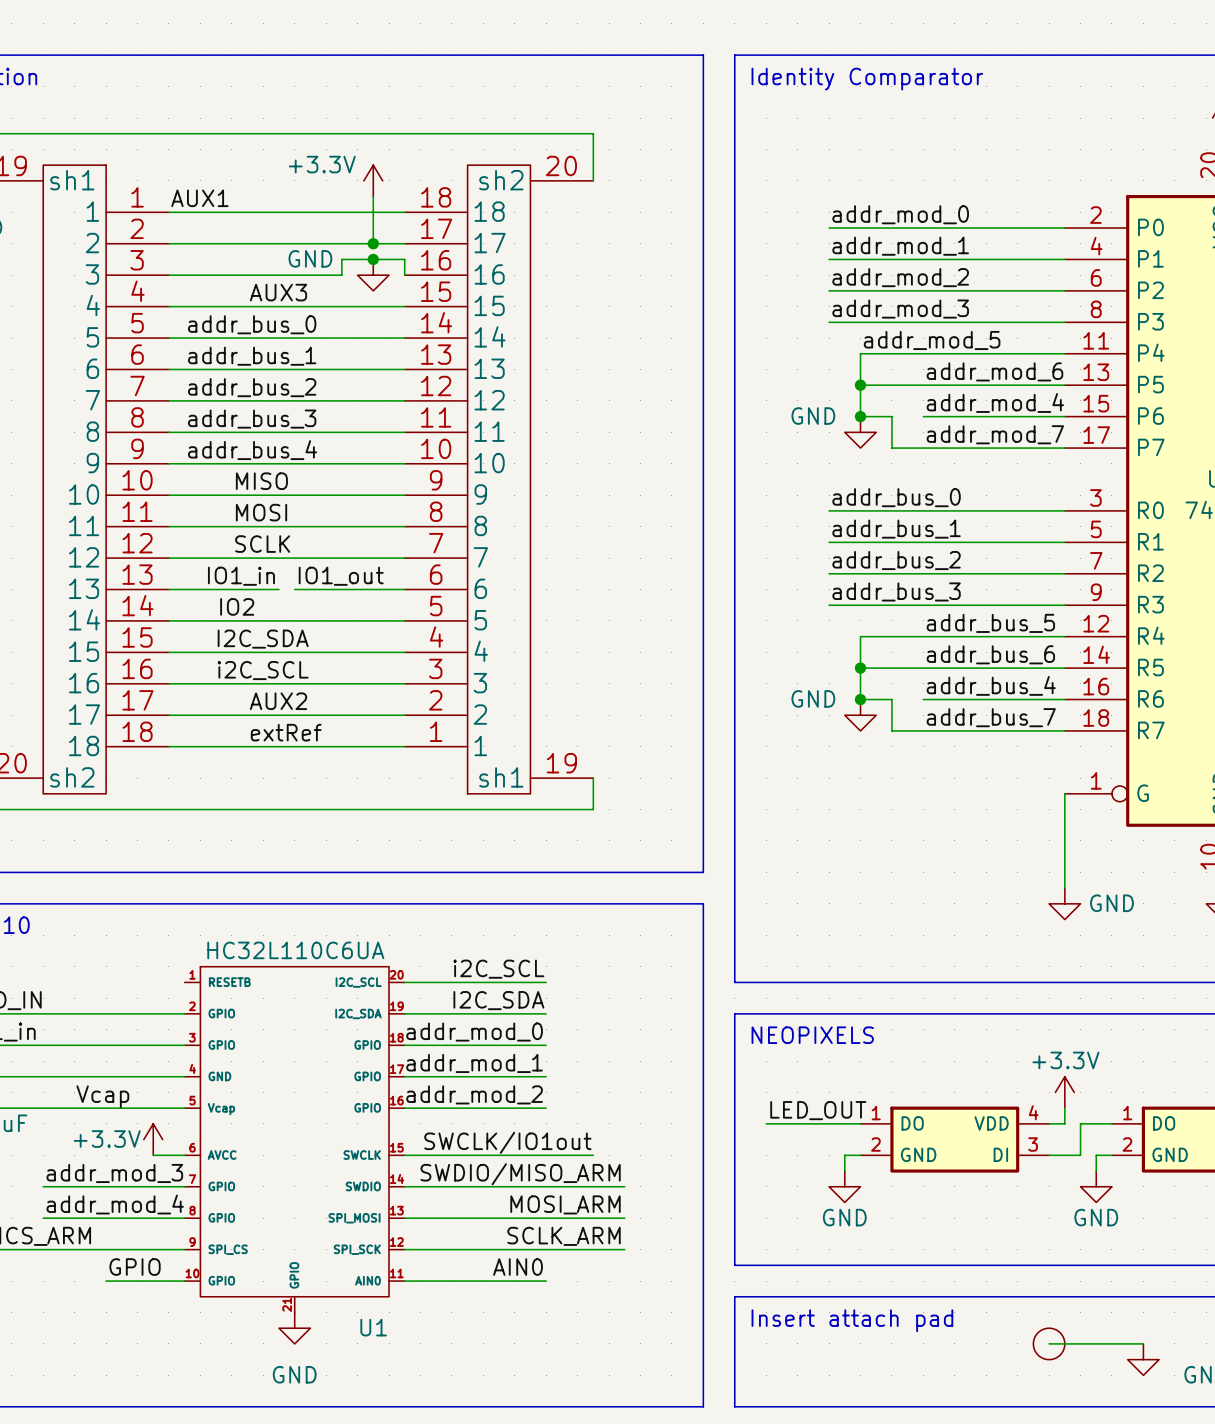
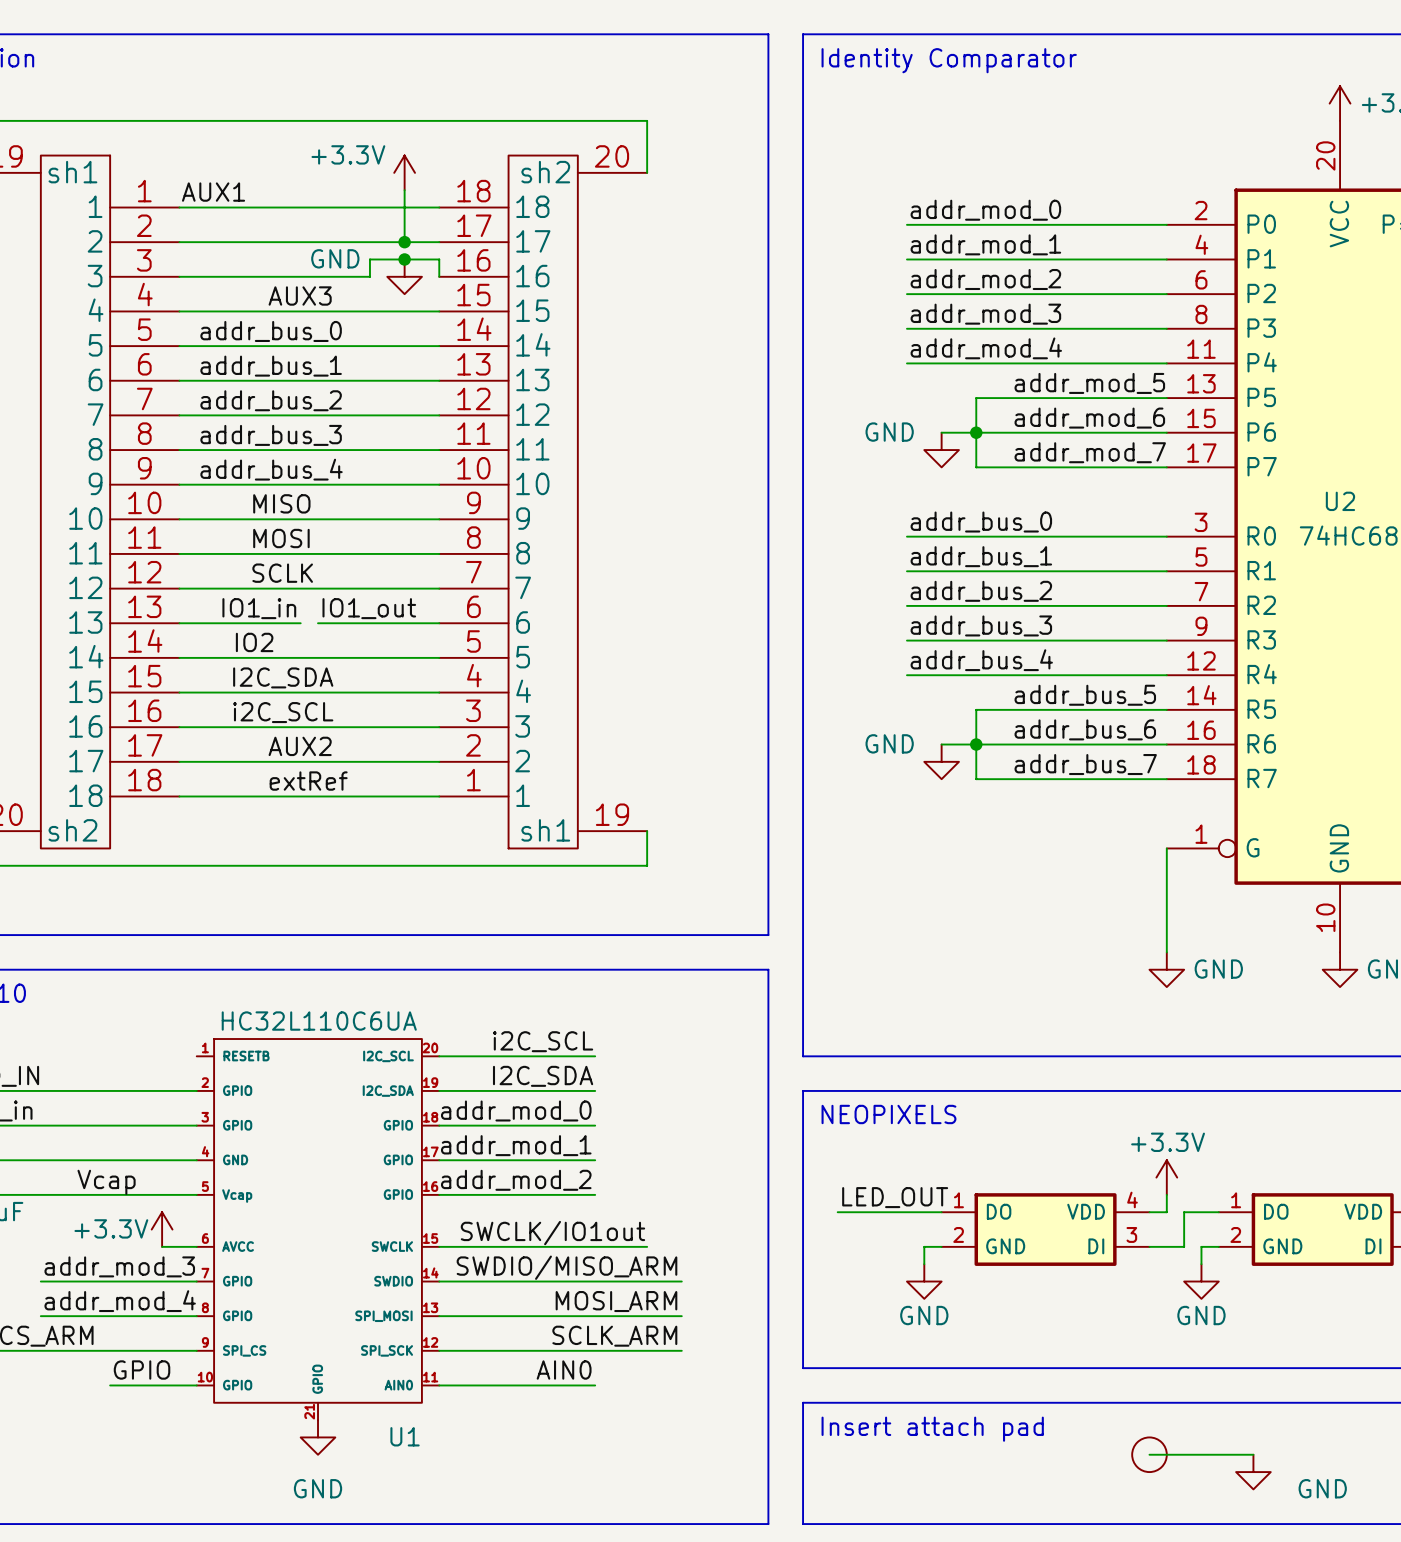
label: addr_mod_5 (932, 340) -> addr_mod_4 (986, 348)
wire: (860, 353) (860, 416) -> (941, 363) (906, 363)
label: addr_mod_6 (994, 371) -> addr_mod_5 (1089, 383)
wire: (860, 385) (891, 385) -> (1010, 432) (976, 432) (976, 398)
junction: (860, 385) -> none
label: addr_mod_4 (995, 402) -> addr_mod_6 (1089, 418)
junction: (860, 416) -> none
junction: none -> (976, 432)
label: addr_bus_5 (990, 623) -> addr_bus_4 (981, 660)
wire: (860, 636) (860, 699) -> (941, 675) (906, 675)
label: addr_bus_6 (990, 654) -> addr_bus_5 (1085, 695)
wire: (860, 668) (891, 668) -> (1010, 744) (976, 744) (976, 709)
junction: (860, 668) -> none
label: addr_bus_4 (991, 685) -> addr_bus_6 (1085, 729)
junction: (860, 699) -> none
junction: none -> (976, 744)

